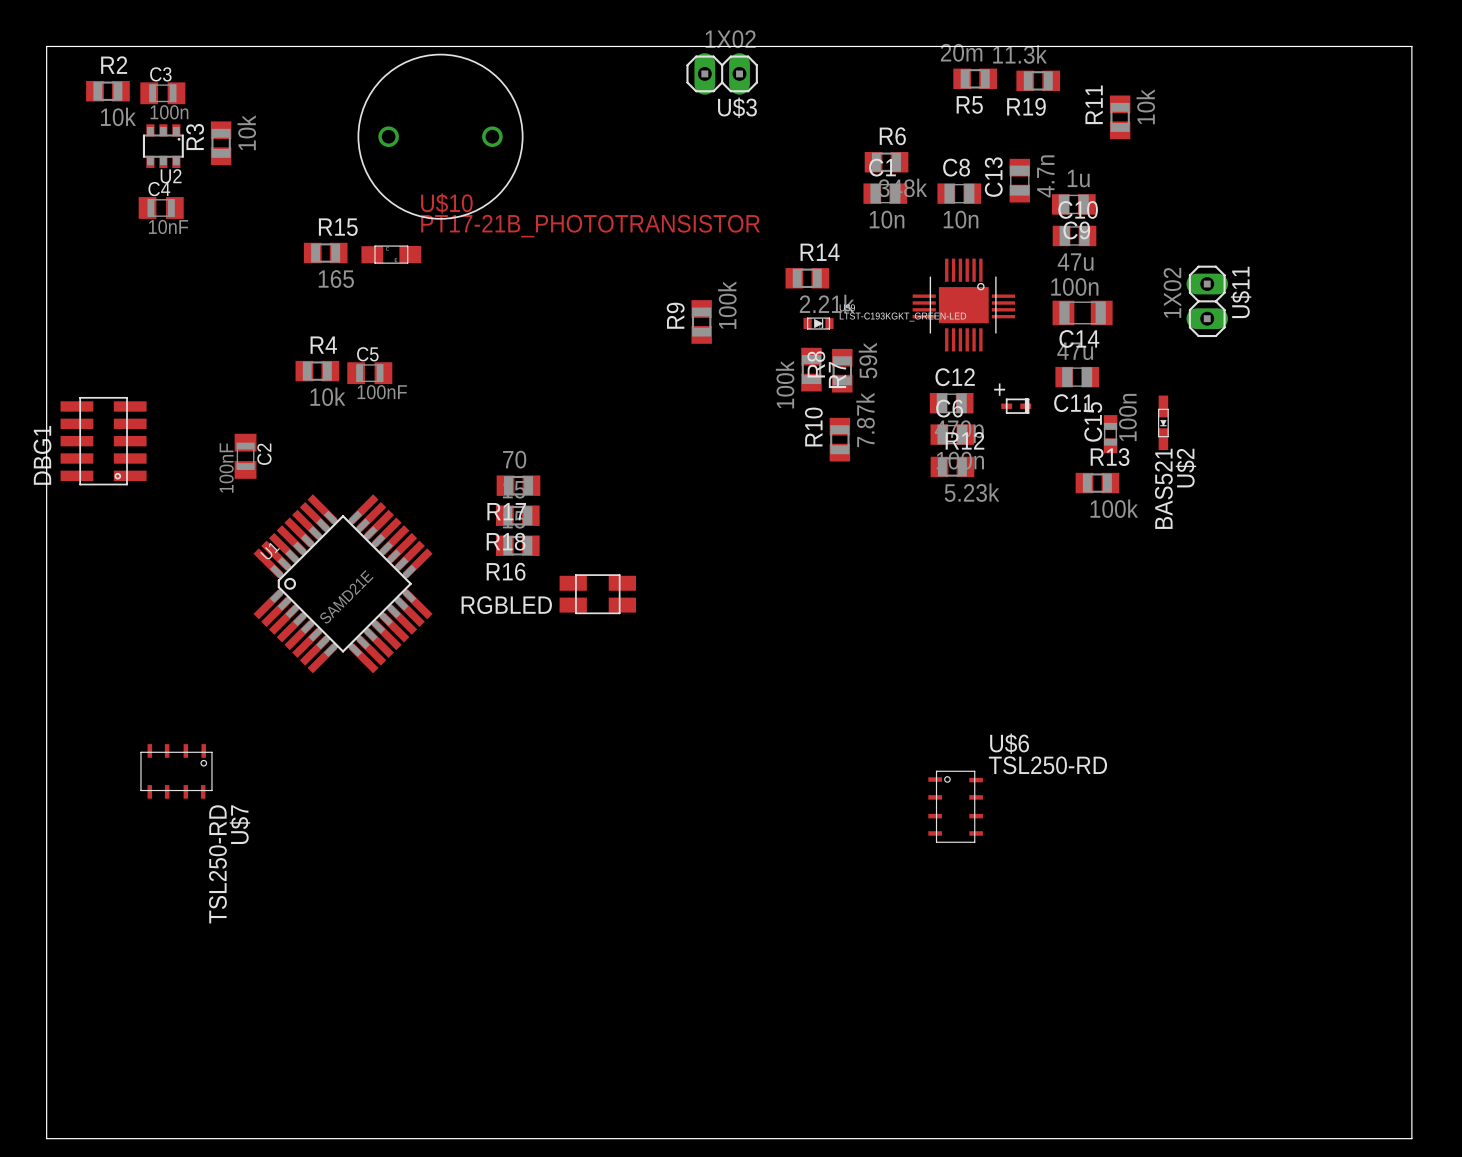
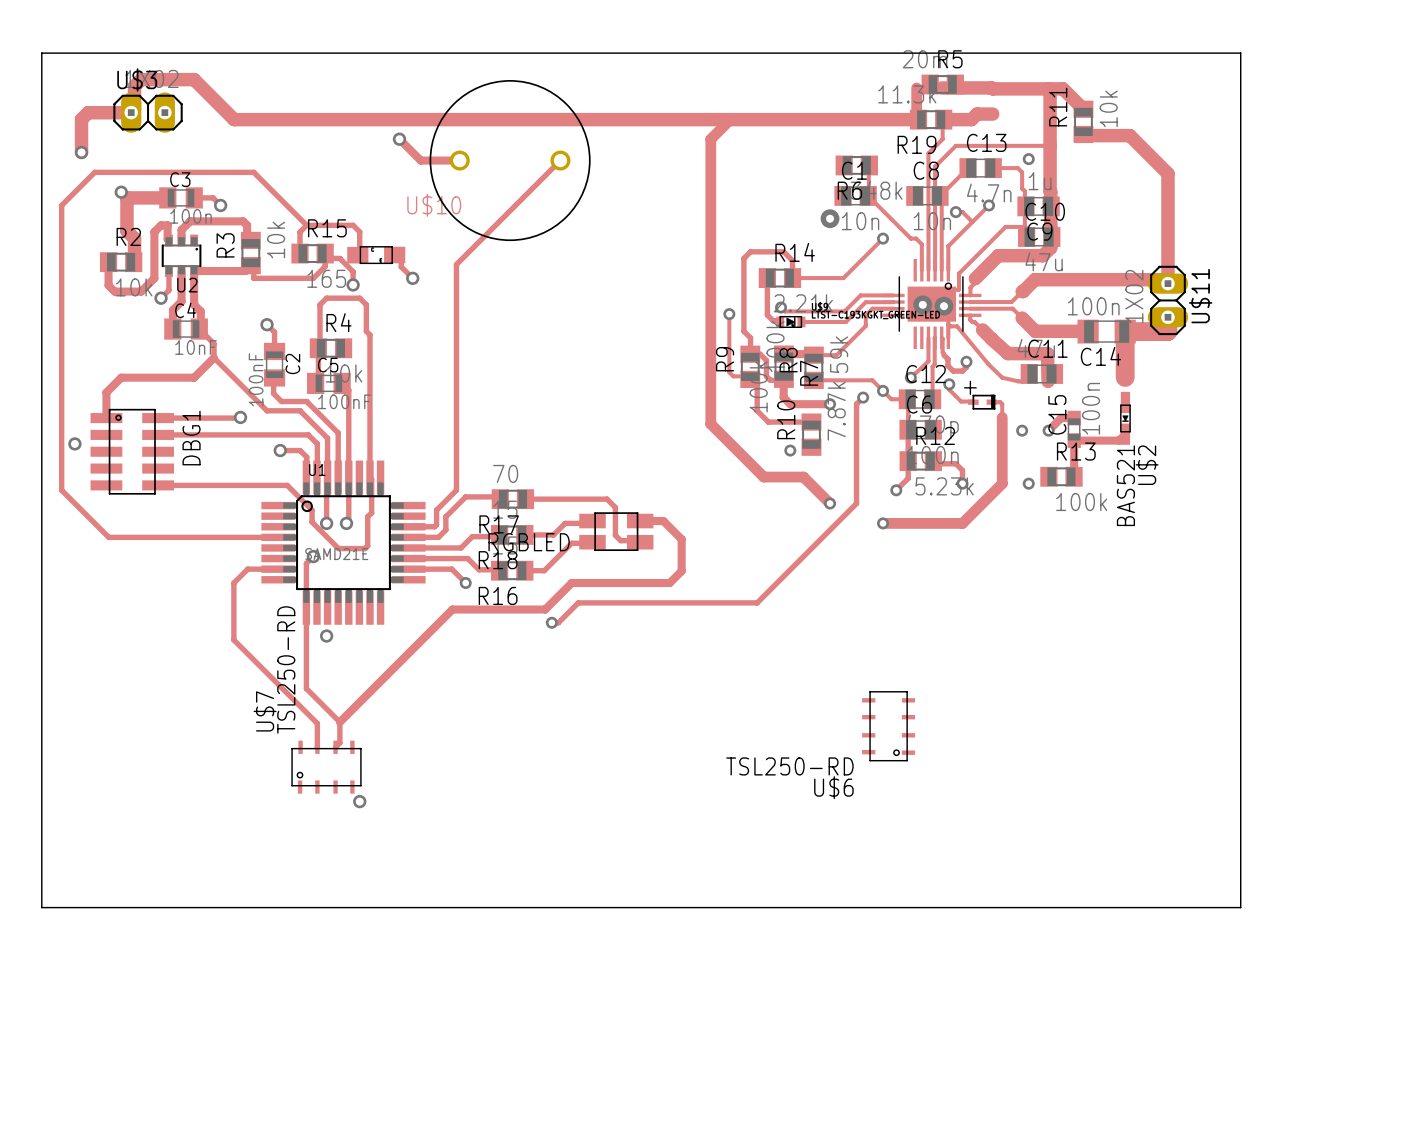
board edge: (1282, 46) (1411, 46) (1411, 1138) (46, 1138) (46, 927) -> (1240, 53) (1240, 907) (41, 907)
U$3 position: (722, 73) -> (148, 112)
R19 position: (1038, 80) -> (931, 119)
track: none -> (916, 87) (916, 117) (918, 119)
track: none -> (941, 87) (1063, 88) (1083, 109)
track: none -> (1048, 88) (1050, 247) (1042, 255) (998, 255) (975, 278) (975, 282) (970, 287) (970, 295)
R2 position: (107, 91) -> (121, 262)
C3 position: (162, 93) -> (181, 197)
R5 name position: R5 (969, 104) -> R5 (950, 59)
U$3 name position: U$3 (737, 107) -> U$3 (137, 79)
track: none -> (992, 114) (977, 114) (971, 119) (943, 119) (942, 139) (928, 153) (928, 270)
track: none -> (918, 119) (234, 119) (194, 79) (141, 79) (134, 86) (134, 109) (131, 112) (88, 112) (81, 119) (81, 152)
track: none -> (918, 119) (730, 119) (710, 139) (710, 424) (763, 477) (803, 477) (830, 503)
track: none -> (1083, 134) (1129, 135) (1167, 173) (1167, 283) (1164, 279) (1034, 279) (1011, 302) (970, 302)
track: none -> (399, 139) (420, 160) (459, 161)
via: none -> (399, 139)
part position: (440, 136) -> (510, 160)
R6 name position: R6 (892, 136) -> R6 (849, 190)
track: none -> (1050, 145) (955, 145) (935, 166) (935, 270)
R3 position: (221, 143) -> (250, 253)
U2 position: (163, 146) -> (181, 255)
via: none -> (81, 152)
track: none -> (868, 159) (868, 195) (910, 238) (916, 238) (921, 244) (921, 270)
via: none -> (1028, 159)
track: none -> (560, 160) (456, 264) (456, 490) (436, 510) (436, 524) (434, 526) (408, 526)
track: none -> (968, 168) (941, 194) (941, 270)
track: none -> (993, 168) (1017, 168) (1022, 172) (1022, 188) (1024, 191) (1025, 226) (1005, 226) (958, 273) (958, 289) (944, 289) (942, 291) (943, 310) (948, 317) (948, 337)
C13 rotation: 0° (1019, 180) -> 90° clockwise (980, 168)
via: none -> (121, 192)
track: none -> (167, 197) (126, 197) (126, 231) (134, 238) (133, 262)
track: none -> (194, 197) (213, 197) (220, 205)
via: none -> (220, 205)
track: none -> (989, 205) (948, 246) (948, 270)
via: none -> (989, 205)
C4 position: (161, 207) -> (186, 329)
track: none -> (955, 212) (962, 212) (972, 222)
via: none -> (955, 212)
via: none -> (830, 218)
track: none -> (306, 225) (253, 172) (94, 172) (61, 205) (61, 490) (108, 537) (278, 537)
track: none -> (306, 225) (299, 232) (299, 253)
track: none -> (306, 225) (353, 225) (359, 231) (359, 250) (364, 255)
U$10 value: PT17-21B_PHOTOTRANSISTOR (590, 226) -> none
track: none -> (883, 238) (843, 278) (792, 278) (792, 260) (783, 251) (750, 251) (743, 258) (743, 331) (750, 337) (750, 354) (760, 354) (766, 360) (766, 376) (770, 380) (783, 379) (783, 397) (790, 404) (830, 404)
via: none -> (883, 238)
track: none -> (168, 240) (167, 225) (161, 225) (154, 231) (154, 278) (141, 291) (114, 291) (108, 285) (108, 262)
track: none -> (250, 240) (247, 236) (247, 225) (243, 221) (190, 221) (181, 229) (181, 240)
track: none -> (401, 255) (401, 266) (412, 278)
track: none -> (168, 271) (168, 290) (161, 298)
track: none -> (181, 271) (181, 301) (172, 310) (172, 328)
via: none -> (412, 278)
track: none -> (767, 278) (767, 315) (773, 320) (780, 321)
track: none -> (353, 284) (353, 271) (339, 258) (330, 258) (325, 253) (325, 266) (313, 278) (253, 278) (253, 268) (250, 265) (245, 271) (194, 271) (194, 304) (200, 311) (199, 329) (214, 343) (214, 357)
via: none -> (353, 284)
track: none -> (893, 295) (860, 295) (844, 311) (784, 311) (781, 307)
via: none -> (161, 298)
track: none -> (893, 302) (865, 302) (846, 321) (801, 321)
via: none -> (922, 304)
via: none -> (943, 306)
via: none -> (781, 307)
track: none -> (893, 308) (872, 308) (865, 315) (865, 326) (836, 355) (783, 354)
track: none -> (970, 308) (1012, 308) (1035, 331) (1088, 331)
C14 position: (1082, 312) -> (1106, 331)
track: none -> (729, 314) (729, 372) (733, 376) (747, 376) (757, 386) (757, 410) (768, 422) (811, 422)
via: none -> (729, 314)
track: none -> (970, 315) (970, 319) (1007, 353) (1047, 353) (1048, 381)
track: none -> (1167, 317) (1167, 331) (1125, 331) (1125, 377)
R9 position: (701, 321) -> (750, 366)
track: none -> (267, 324) (274, 332) (274, 351)
via: none -> (267, 324)
track: none -> (948, 324) (957, 326) (988, 364) (1002, 377) (1022, 381)
track: none -> (928, 337) (928, 361) (910, 377)
track: none -> (935, 337) (932, 399)
track: none -> (941, 337) (942, 352) (947, 359) (947, 365) (953, 371) (962, 371) (966, 367) (966, 361)
track: none -> (214, 357) (267, 410) (300, 410) (327, 438) (326, 523)
track: none -> (214, 357) (194, 377) (121, 377) (106, 392) (106, 418)
via: none -> (966, 361)
R4 position: (317, 371) -> (330, 348)
C5 position: (369, 373) -> (328, 383)
via: none -> (910, 377)
track: none -> (274, 377) (273, 393) (281, 401) (306, 401) (338, 432) (338, 477)
track: none -> (813, 380) (872, 380) (891, 399) (908, 399) (908, 429)
track: none -> (315, 383) (318, 380) (319, 304) (326, 298) (359, 298) (366, 304) (366, 331) (369, 334) (371, 512) (367, 516) (367, 545) (365, 548) (338, 548) (312, 522) (312, 510) (287, 485) (158, 485)
track: none -> (342, 383) (348, 390) (348, 521) (346, 523)
track: none -> (949, 384) (949, 389) (961, 401) (973, 402)
via: none -> (949, 384)
via: none -> (883, 390)
track: none -> (863, 397) (856, 404) (856, 503) (757, 602) (578, 602) (558, 622) (551, 622)
via: none -> (863, 397)
C11 name position: C11 (1073, 403) -> C11 (1047, 348)
track: none -> (991, 402) (1000, 402) (1002, 404) (1002, 424)
via: none -> (830, 404)
track: none -> (240, 417) (158, 418)
via: none -> (240, 417)
track: none -> (1002, 417) (1002, 483) (962, 523) (883, 523)
track: none -> (1074, 418) (1061, 418) (1048, 430)
track: none -> (908, 429) (908, 478) (896, 490)
via: none -> (1022, 430)
via: none -> (1048, 430)
track: none -> (158, 434) (308, 434) (317, 443) (316, 477)
track: none -> (1125, 434) (1119, 440) (1074, 440) (1074, 476)
DBG1 rotation: 0° (103, 441) -> 180° (132, 451)
via: none -> (74, 443)
C2 position: (245, 456) -> (274, 364)
track: none -> (280, 450) (300, 450) (306, 457) (306, 477)
via: none -> (280, 450)
via: none -> (790, 450)
track: none -> (933, 461) (936, 463) (955, 463) (962, 470) (962, 483)
R17 position: (518, 485) -> (512, 499)
via: none -> (962, 483)
via: none -> (1028, 483)
via: none -> (896, 490)
track: none -> (500, 499) (498, 496) (465, 496) (445, 516) (445, 530) (438, 537) (408, 537)
track: none -> (525, 499) (607, 499) (615, 507) (615, 535) (620, 540) (640, 542)
via: none -> (830, 503)
R18 position: (517, 515) -> (512, 534)
track: none -> (592, 521) (590, 523) (565, 523) (553, 534) (524, 534)
track: none -> (640, 521) (663, 521) (681, 539) (681, 571) (669, 583) (571, 583) (545, 609) (452, 609) (339, 722)
via: none -> (326, 523)
via: none -> (346, 523)
via: none -> (883, 523)
track: none -> (499, 534) (497, 536) (472, 536) (461, 547) (408, 547)
R16 position: (517, 545) -> (512, 570)
track: none -> (592, 542) (571, 543) (544, 570) (524, 570)
track: none -> (313, 556) (306, 563) (306, 688) (339, 722)
via: none -> (313, 556)
track: none -> (408, 558) (467, 558) (478, 569) (499, 570)
track: none -> (278, 569) (247, 569) (233, 583) (233, 639) (317, 723) (317, 747)
track: none -> (408, 569) (451, 569) (465, 583)
U1 rotation: 0° (343, 583) -> 45° clockwise (343, 542)
via: none -> (465, 583)
part position: (597, 594) -> (616, 531)
via: none -> (551, 622)
via: none -> (326, 636)
track: none -> (339, 722) (339, 742) (335, 747)
U$7 rotation: 0° (176, 771) -> 180° (326, 767)
U$7 position: (176, 771) -> (326, 767)
U$6 rotation: 0° (955, 806) -> 180° (888, 726)
U$6 position: (955, 806) -> (888, 726)
via: none -> (359, 801)

